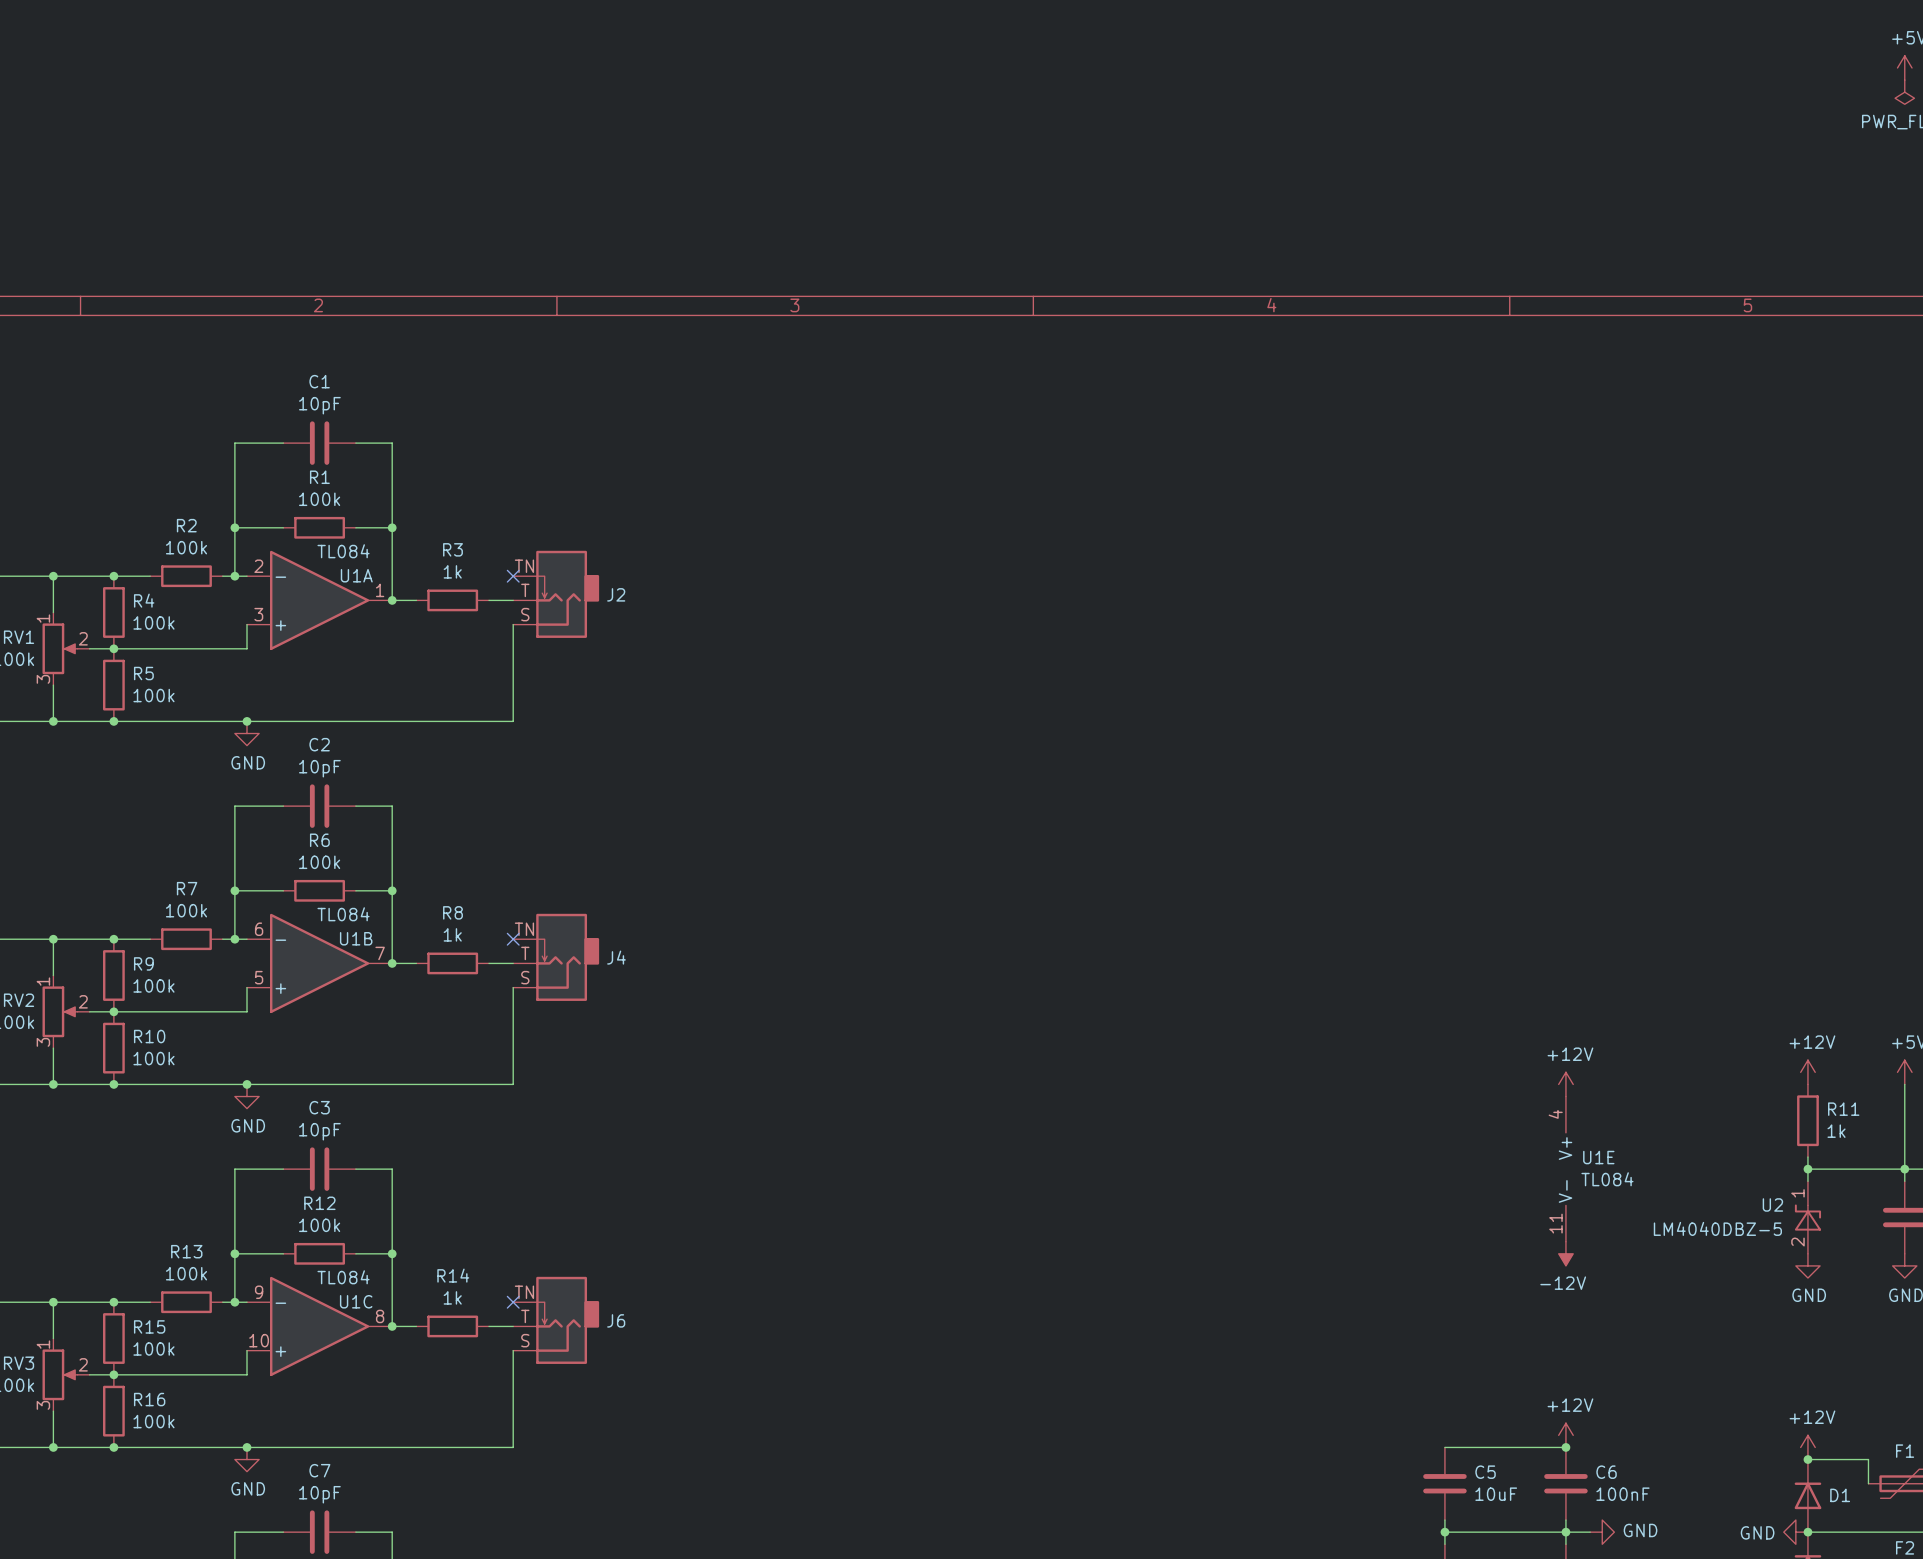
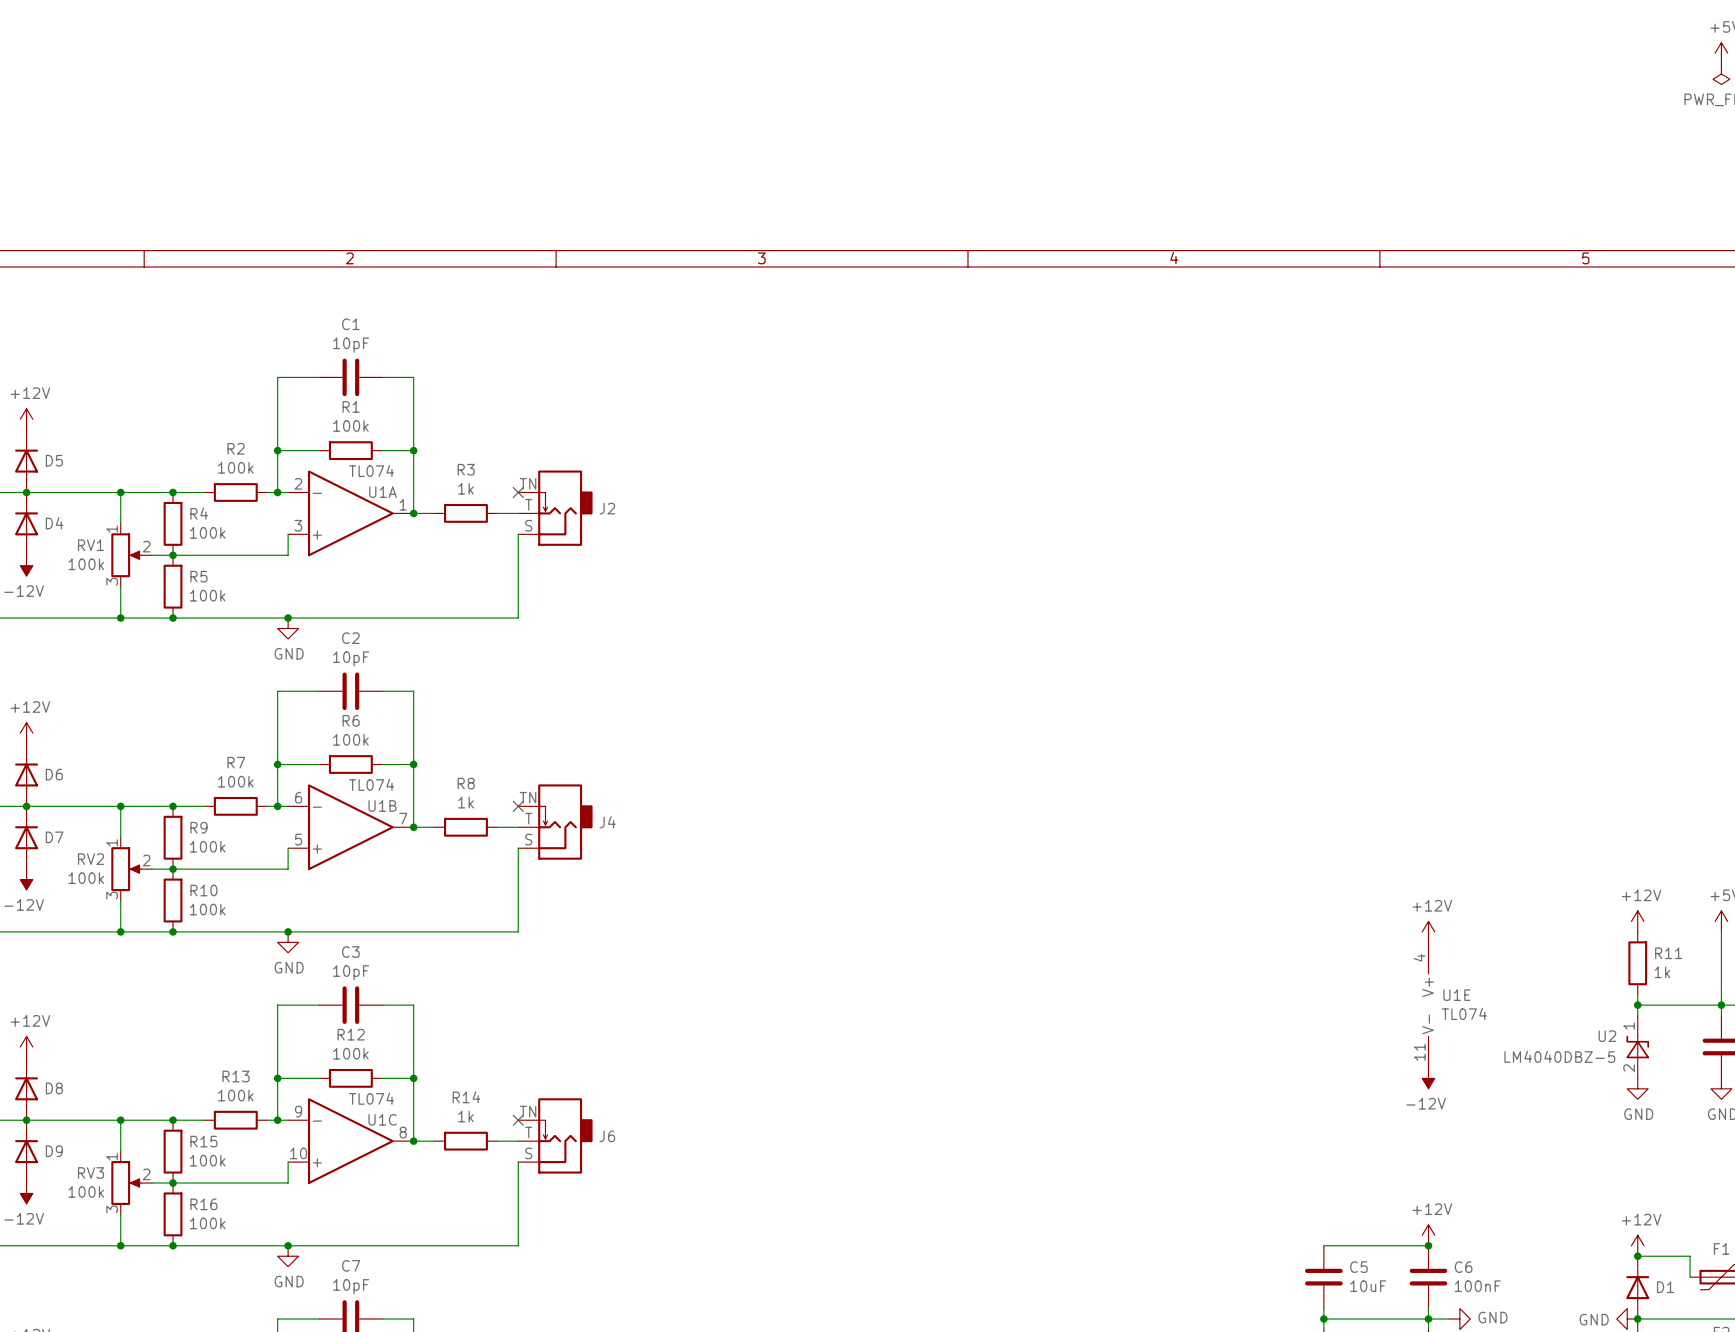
U1A value: TL084 (343, 551) -> TL074 (371, 470)
U1B value: TL084 (343, 914) -> TL074 (371, 784)
U1E value: TL084 (1607, 1179) -> TL074 (1464, 1013)
U1C value: TL084 (343, 1277) -> TL074 (371, 1098)

